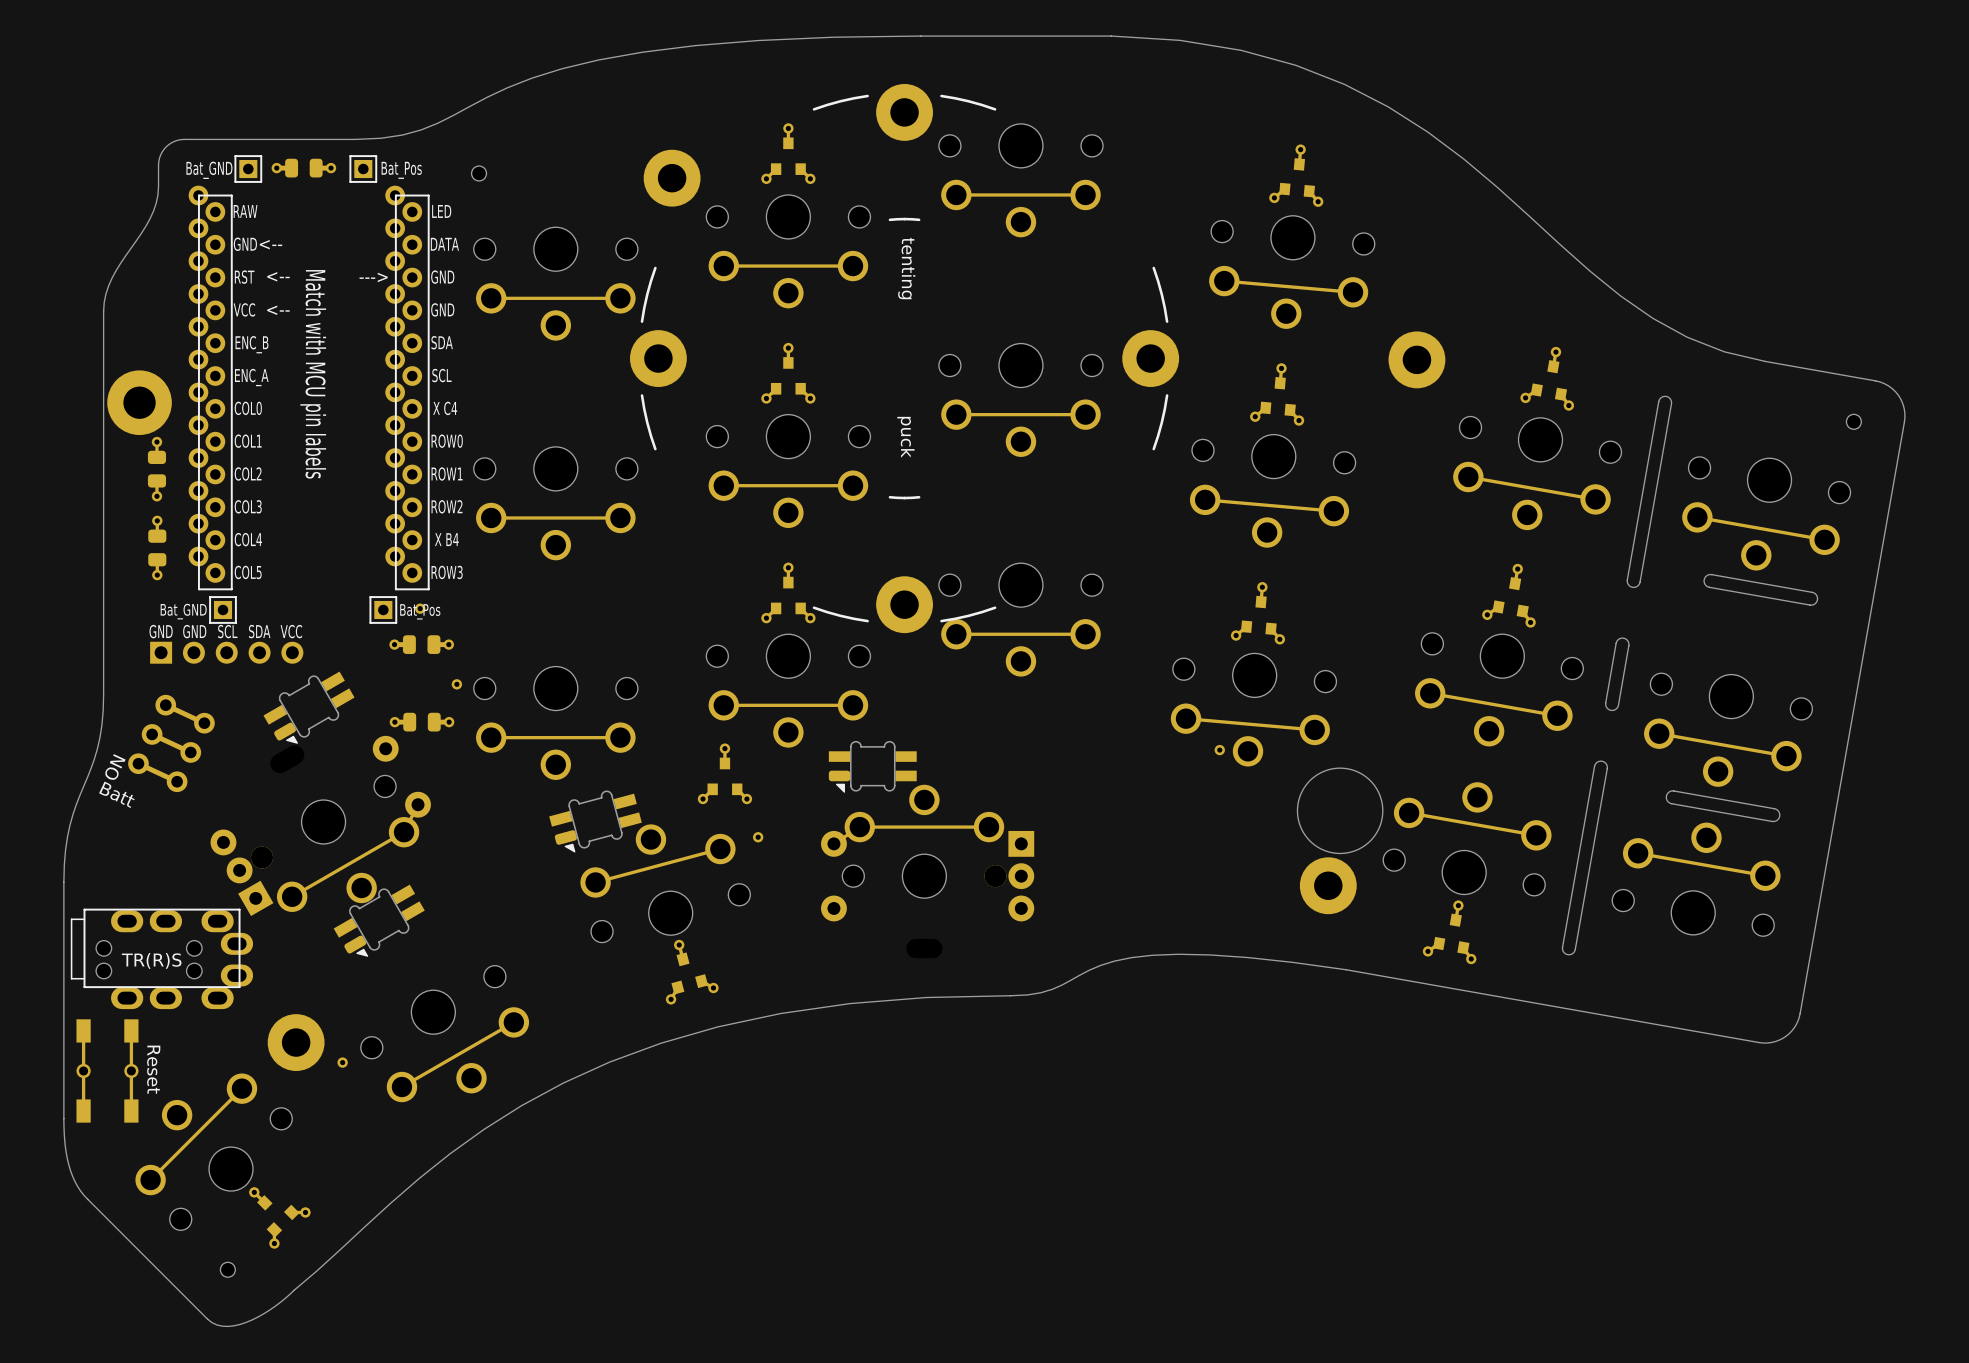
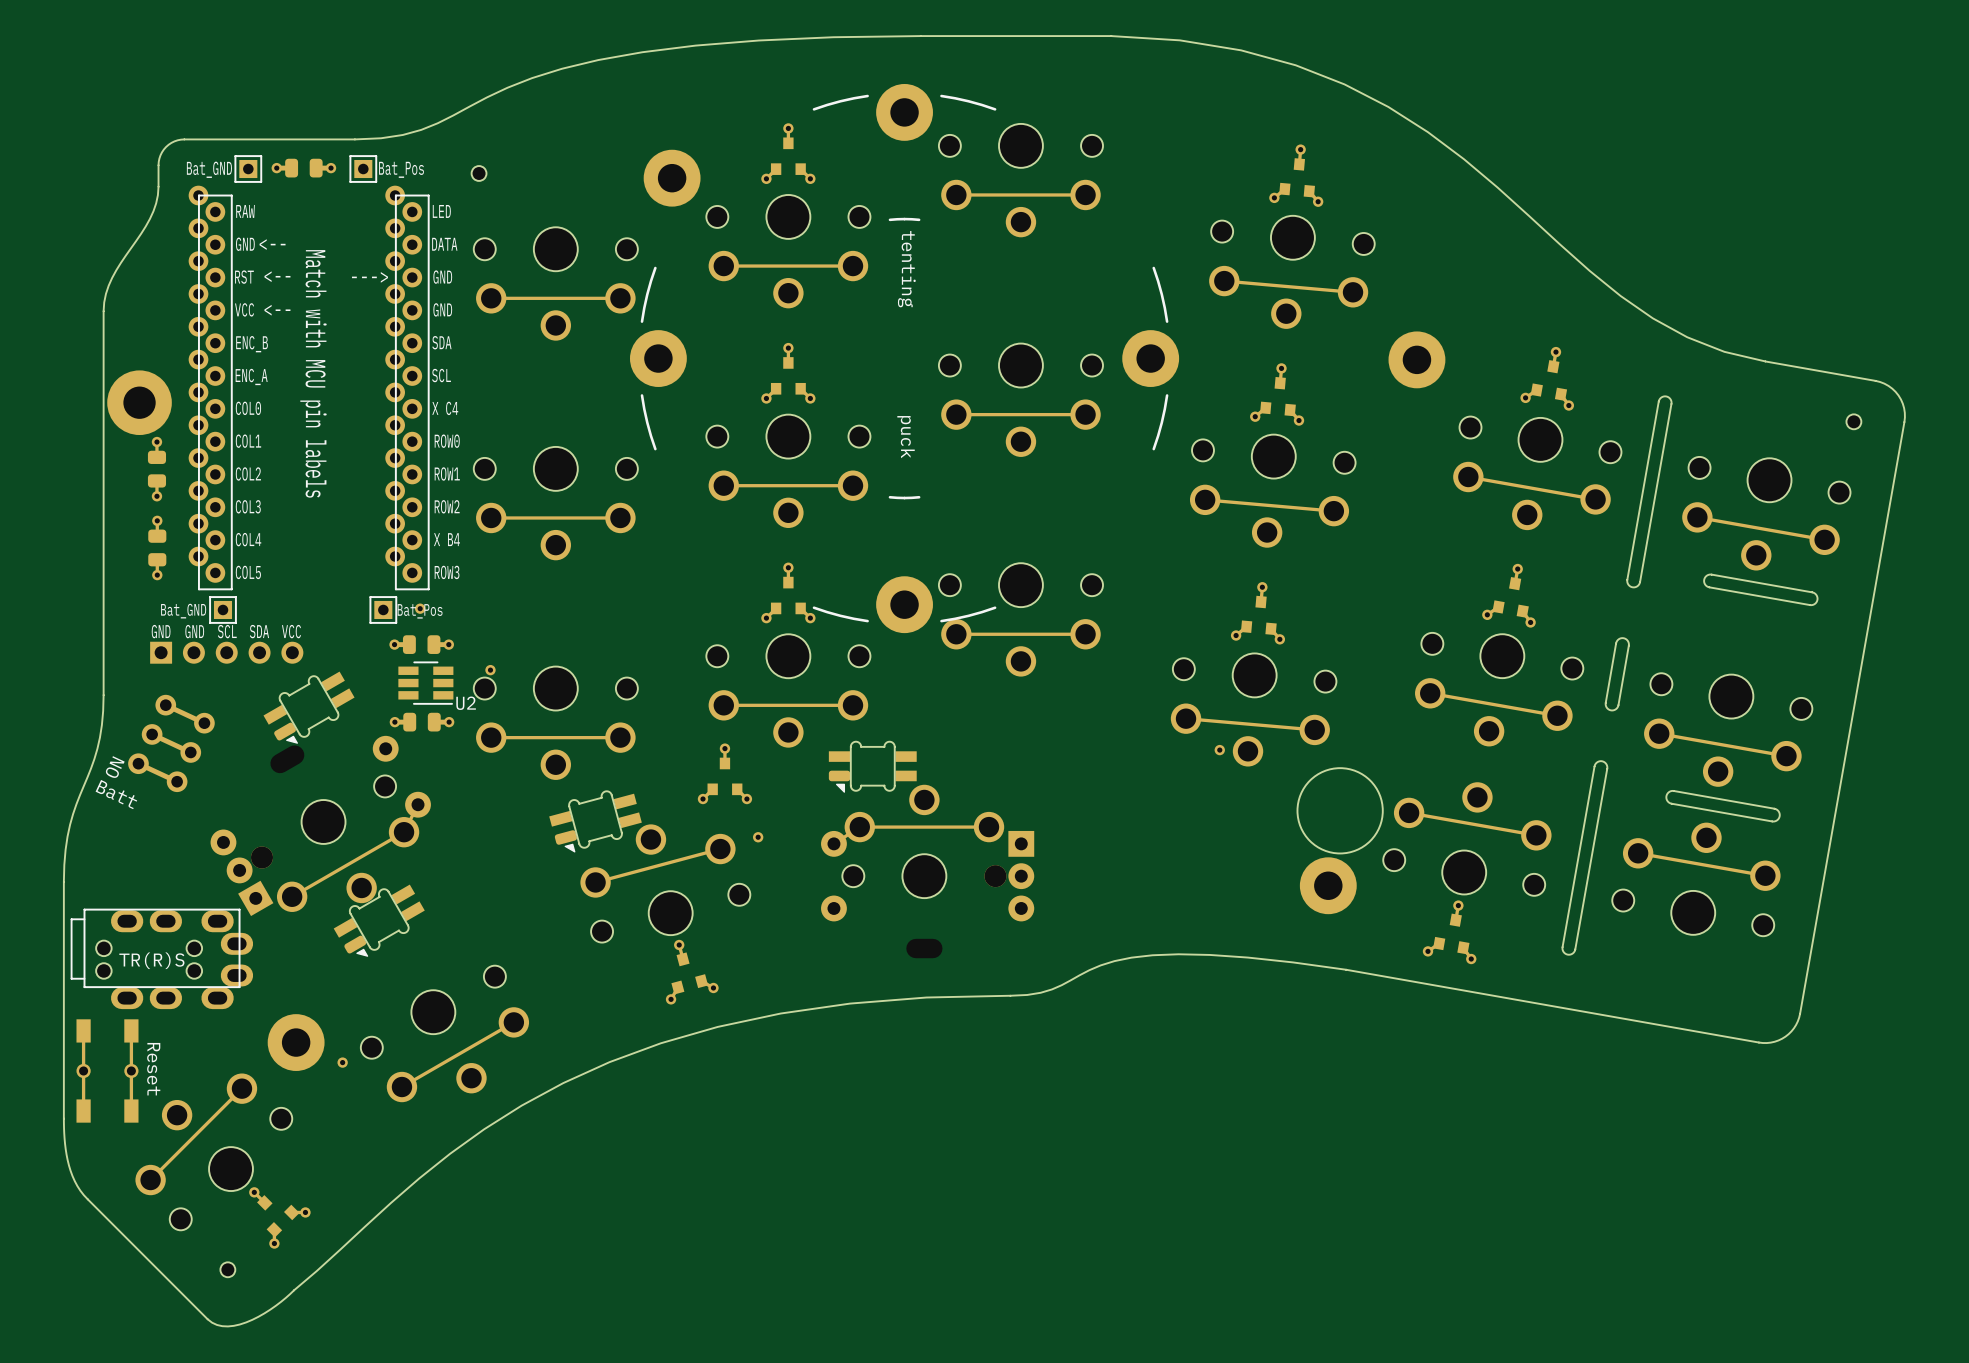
U2: none -> (425, 683)
part position: (456, 684) -> (490, 670)

